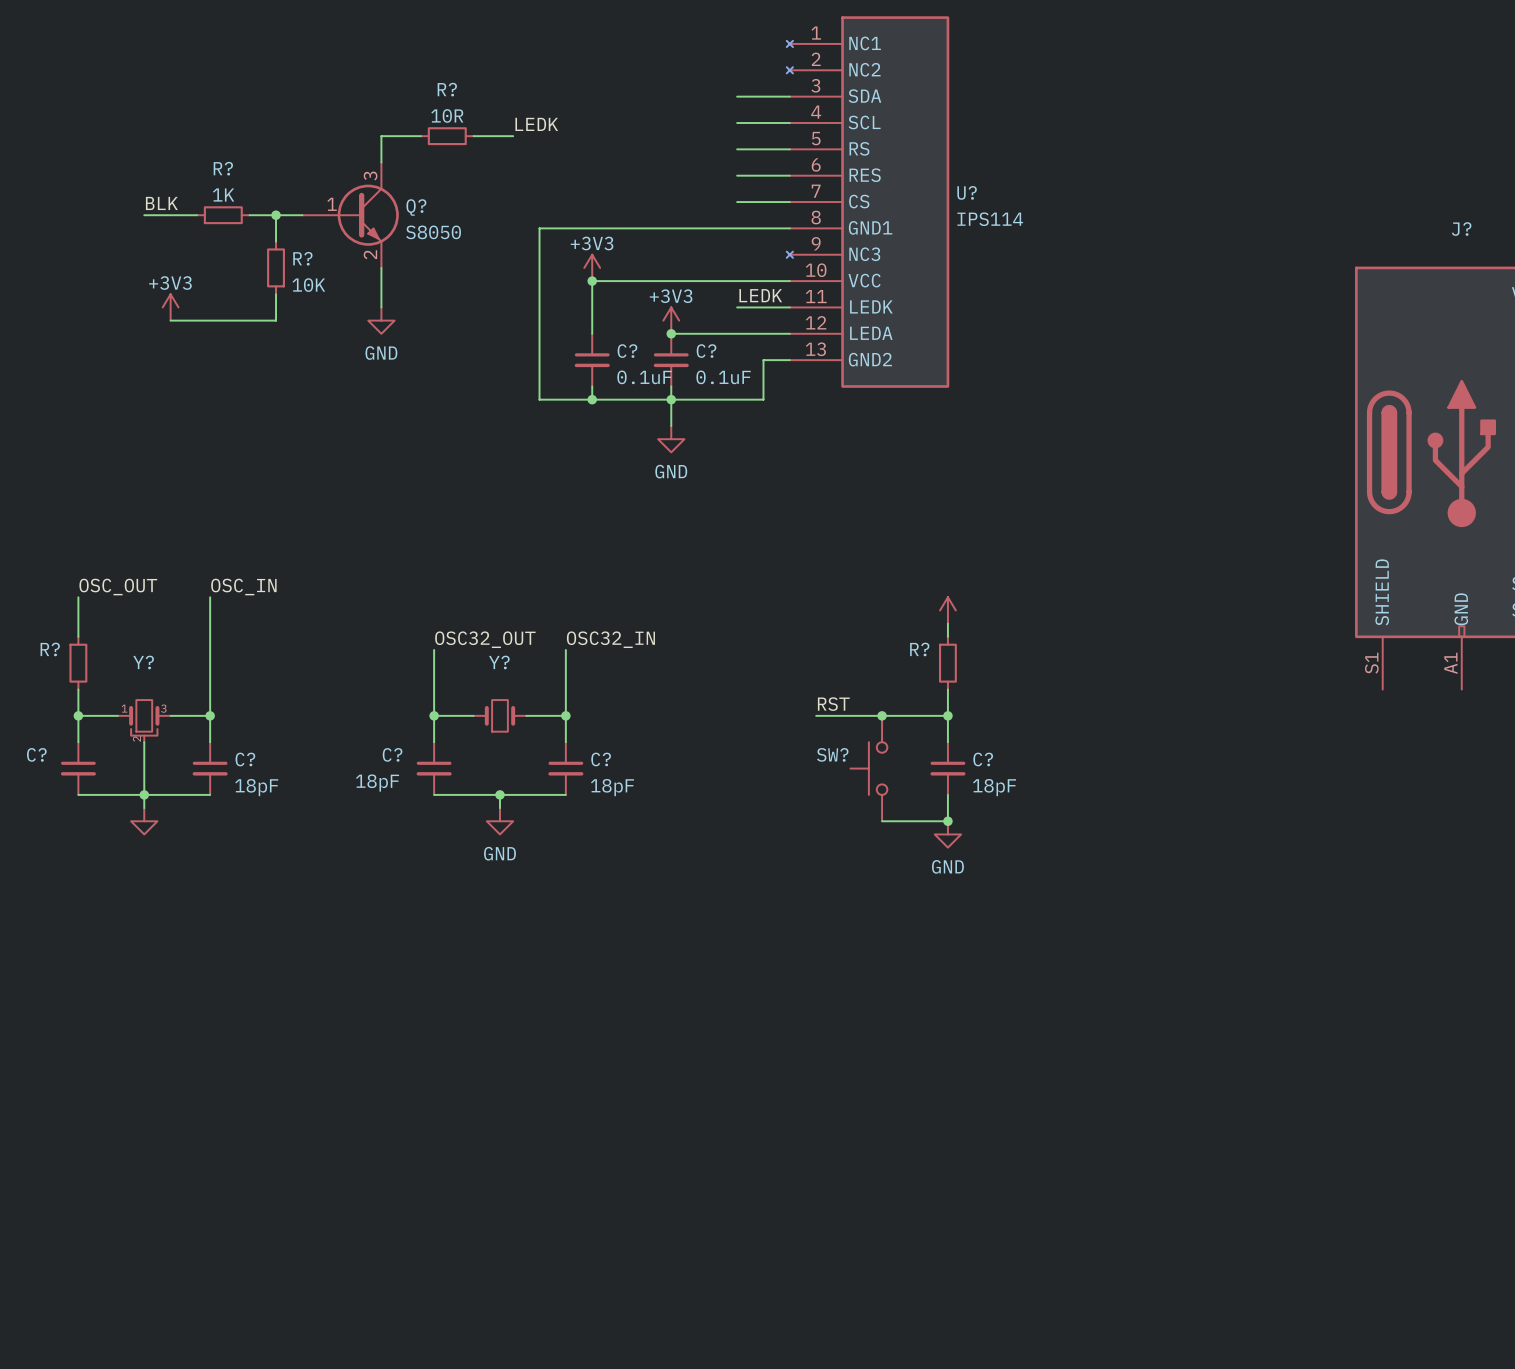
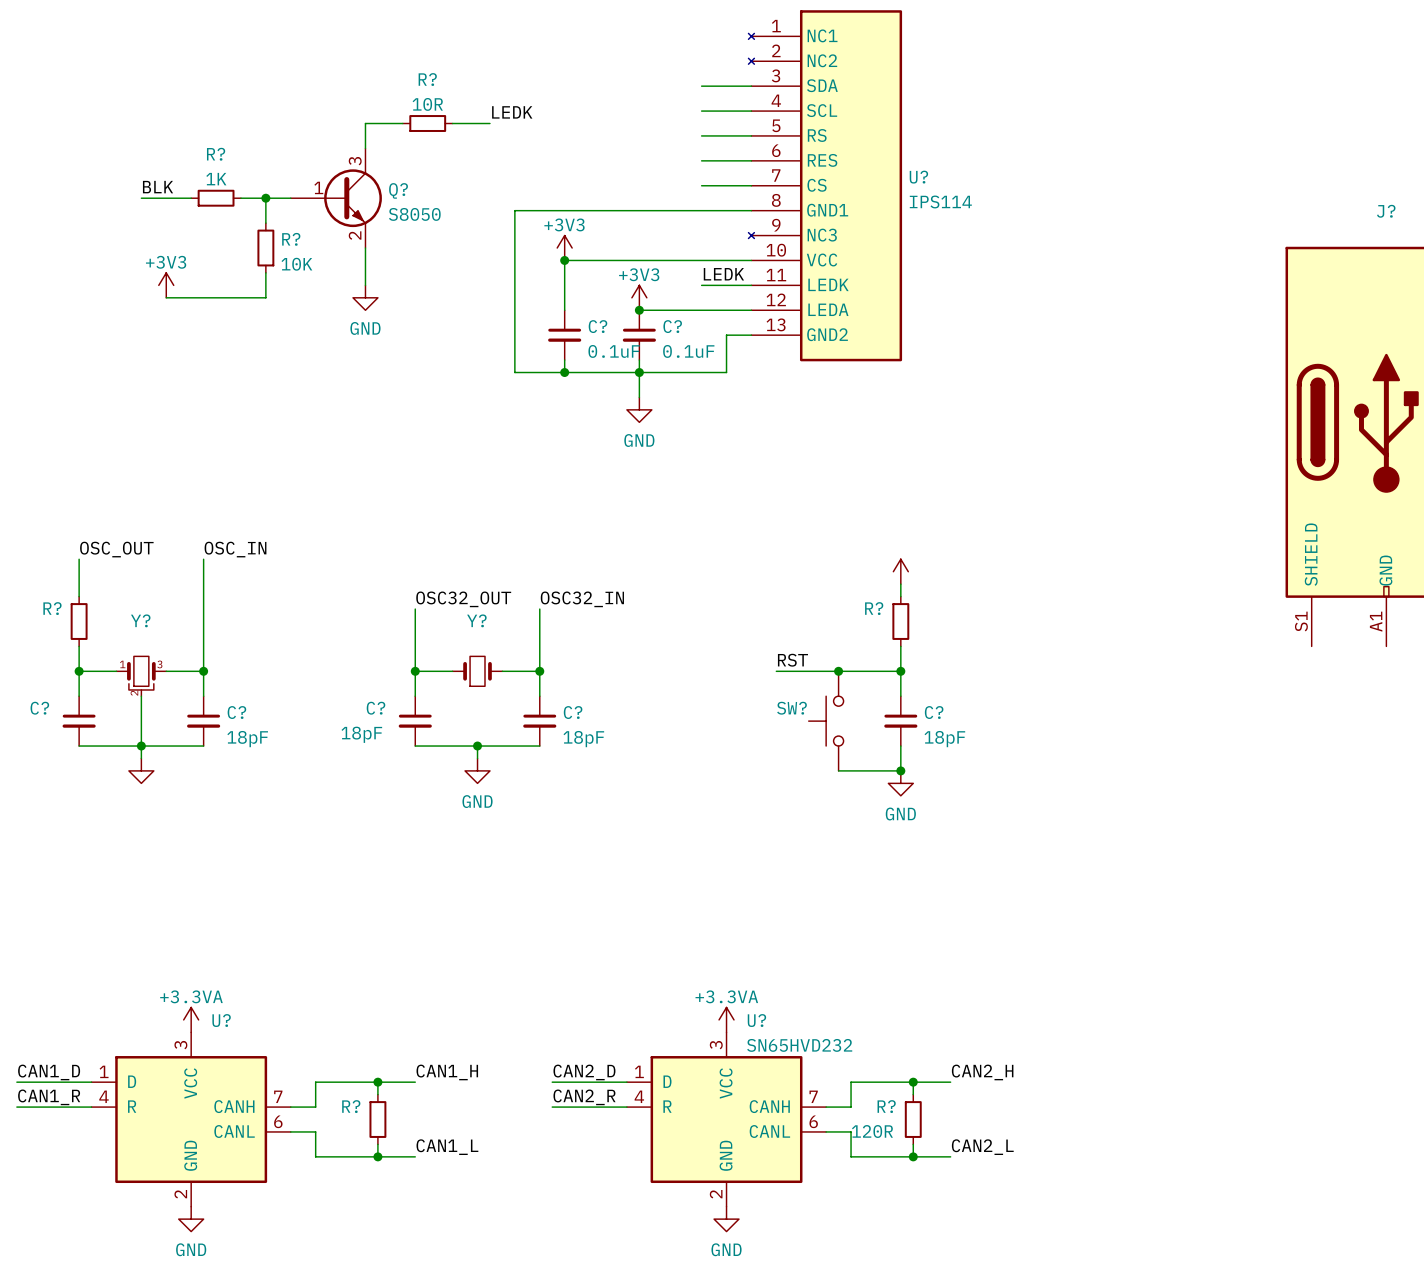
power symbol: none -> +3.3VA (191, 1019)
power symbol: none -> +3.3VA (726, 1019)
label: none -> CAN1_D (49, 1072)
label: none -> CAN1_H (447, 1072)
label: none -> CAN2_D (584, 1072)
label: none -> CAN2_H (982, 1072)
wire: none -> (16, 1082) (91, 1082)
wire: none -> (377, 1082) (377, 1094)
junction: none -> (377, 1082)
wire: none -> (415, 1082) (315, 1082) (315, 1107) (290, 1107)
wire: none -> (552, 1082) (626, 1082)
wire: none -> (913, 1082) (913, 1094)
junction: none -> (913, 1082)
wire: none -> (950, 1082) (851, 1082) (851, 1107) (826, 1107)
label: none -> CAN1_R (49, 1097)
label: none -> CAN2_R (584, 1097)
wire: none -> (16, 1107) (91, 1107)
wire: none -> (552, 1107) (626, 1107)
U?: none -> (191, 1119)
R?: none -> (377, 1119)
U?: none -> SN65HVD232 (726, 1119)
R?: none -> 120R (913, 1119)
wire: none -> (290, 1131) (315, 1131) (315, 1156) (415, 1156)
wire: none -> (826, 1131) (851, 1131) (851, 1156) (950, 1156)
wire: none -> (377, 1144) (377, 1156)
wire: none -> (913, 1144) (913, 1156)
label: none -> CAN1_L (447, 1147)
label: none -> CAN2_L (982, 1147)
junction: none -> (377, 1156)
junction: none -> (913, 1156)
power symbol: none -> GND (191, 1219)
power symbol: none -> GND (726, 1219)

